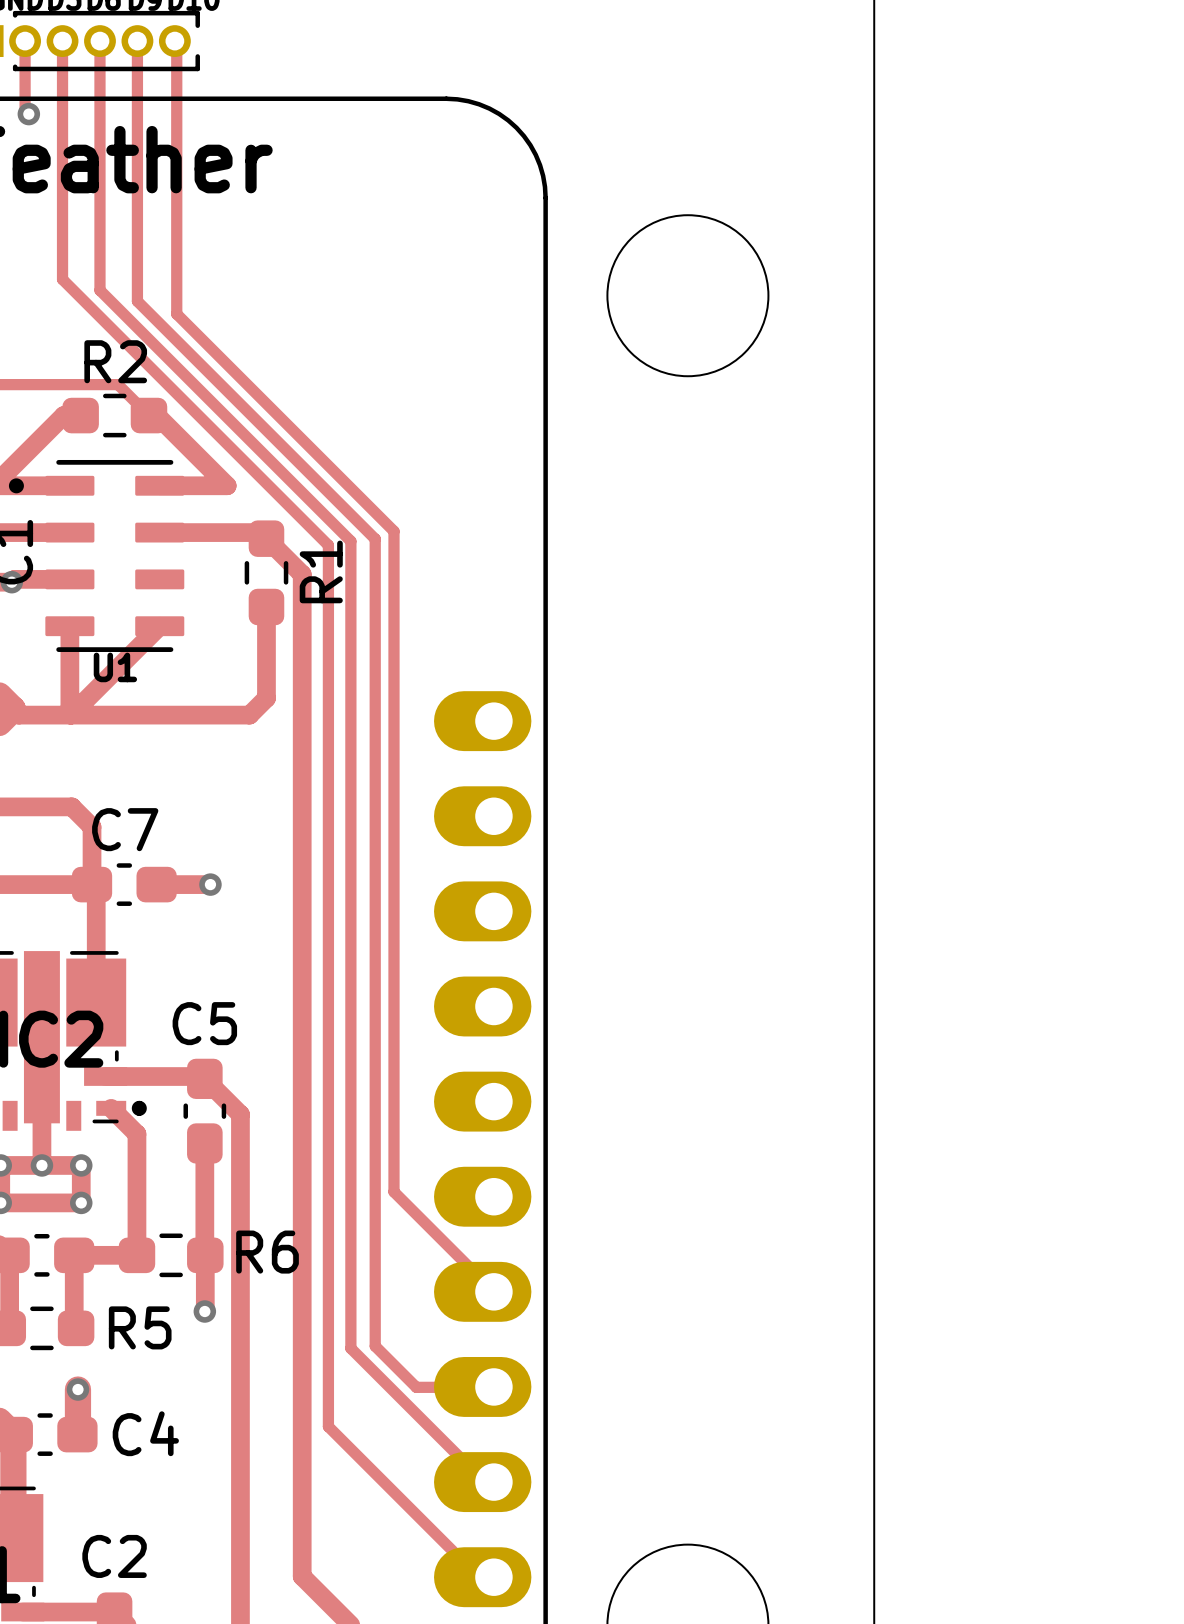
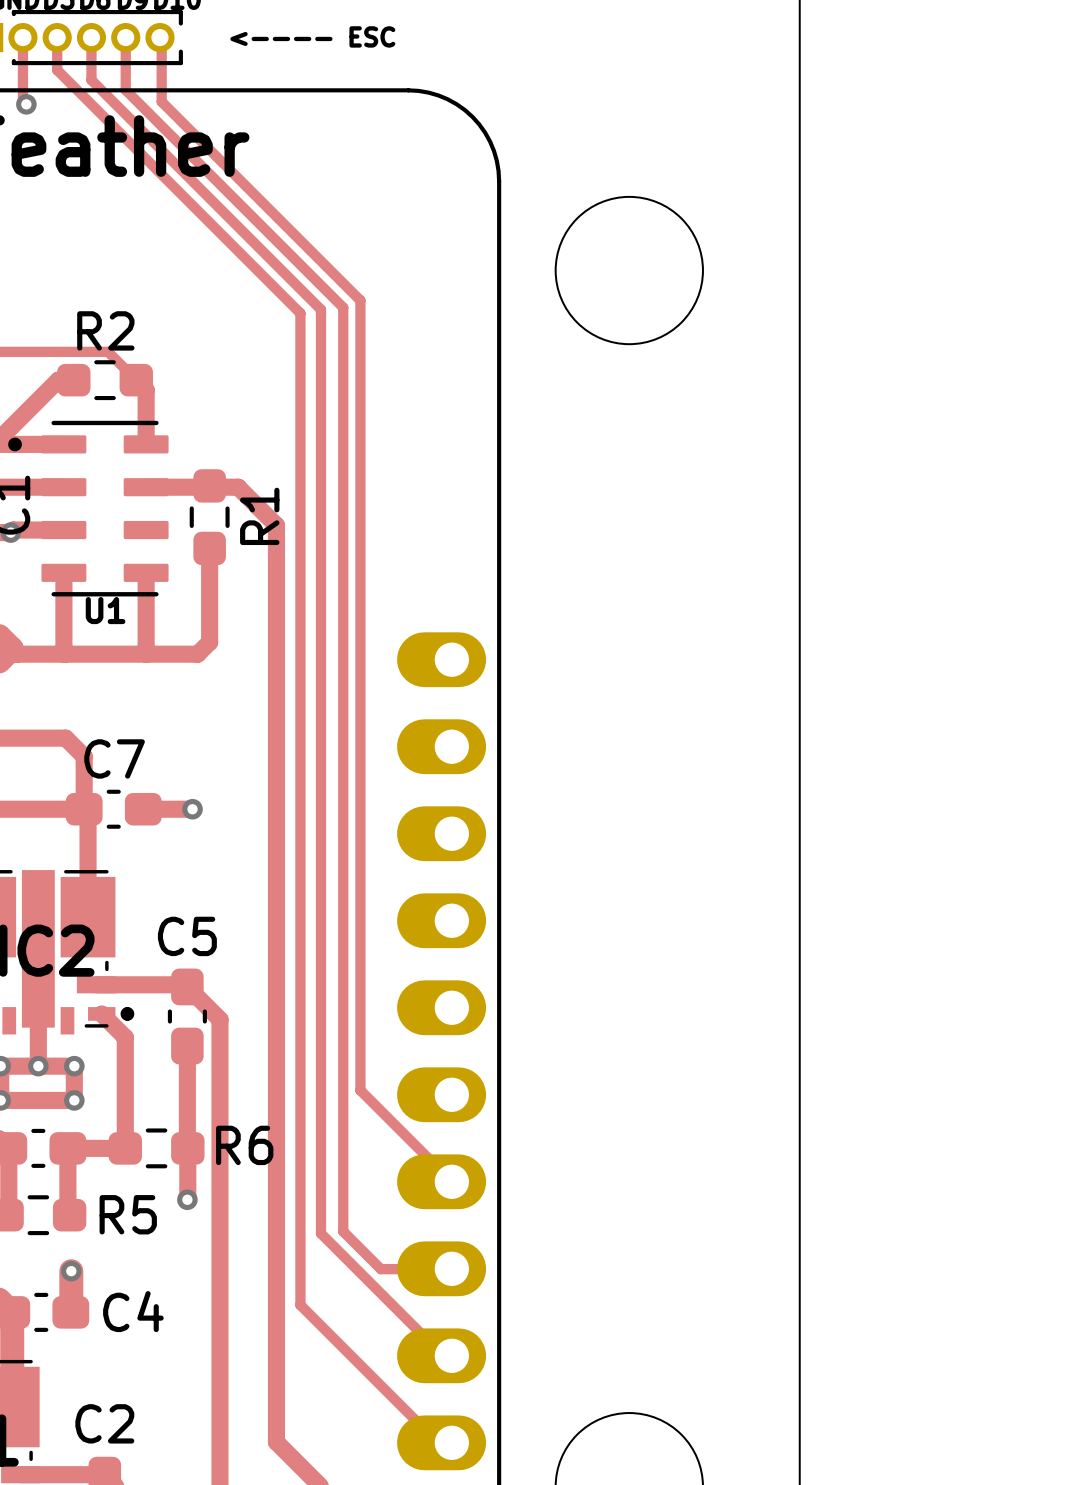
text: none -> <---- ESC (312, 36)
track: (62, 76) (62, 279) (328, 545) -> (57, 70) (300, 313) (300, 498)
track: (99, 87) (99, 290) (350, 541) -> (91, 80) (320, 309) (320, 495)
track: (137, 98) (137, 301) (375, 539) -> (125, 90) (343, 307) (343, 493)
track: (176, 111) (176, 314) (393, 531) -> (161, 101) (360, 300) (360, 486)
track: (156, 415) (227, 485) (159, 485) -> (136, 380) (146, 390) (146, 444)
R1 position: (266, 572) -> (209, 517)
track: (266, 607) (266, 698) (249, 715) (216, 715) -> (209, 548) (209, 642) (197, 654)
track: (159, 626) (70, 715) -> (146, 572) (146, 654)

